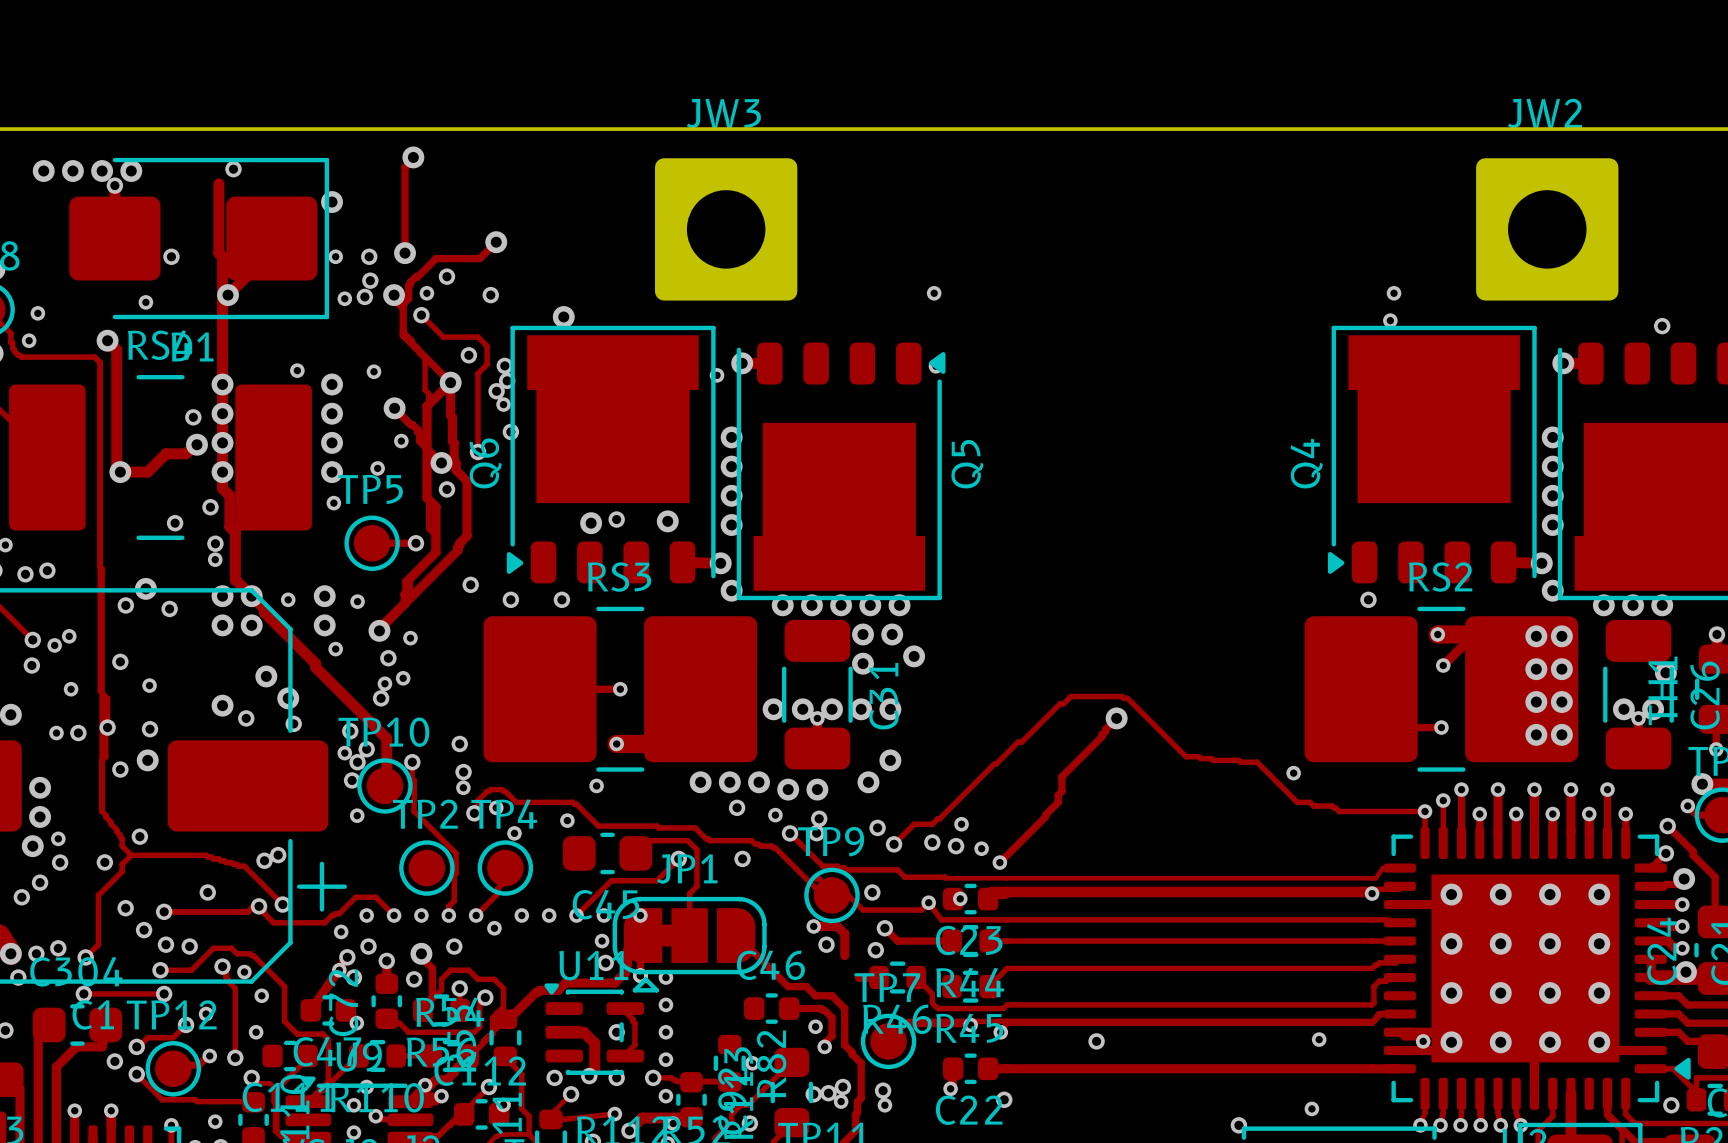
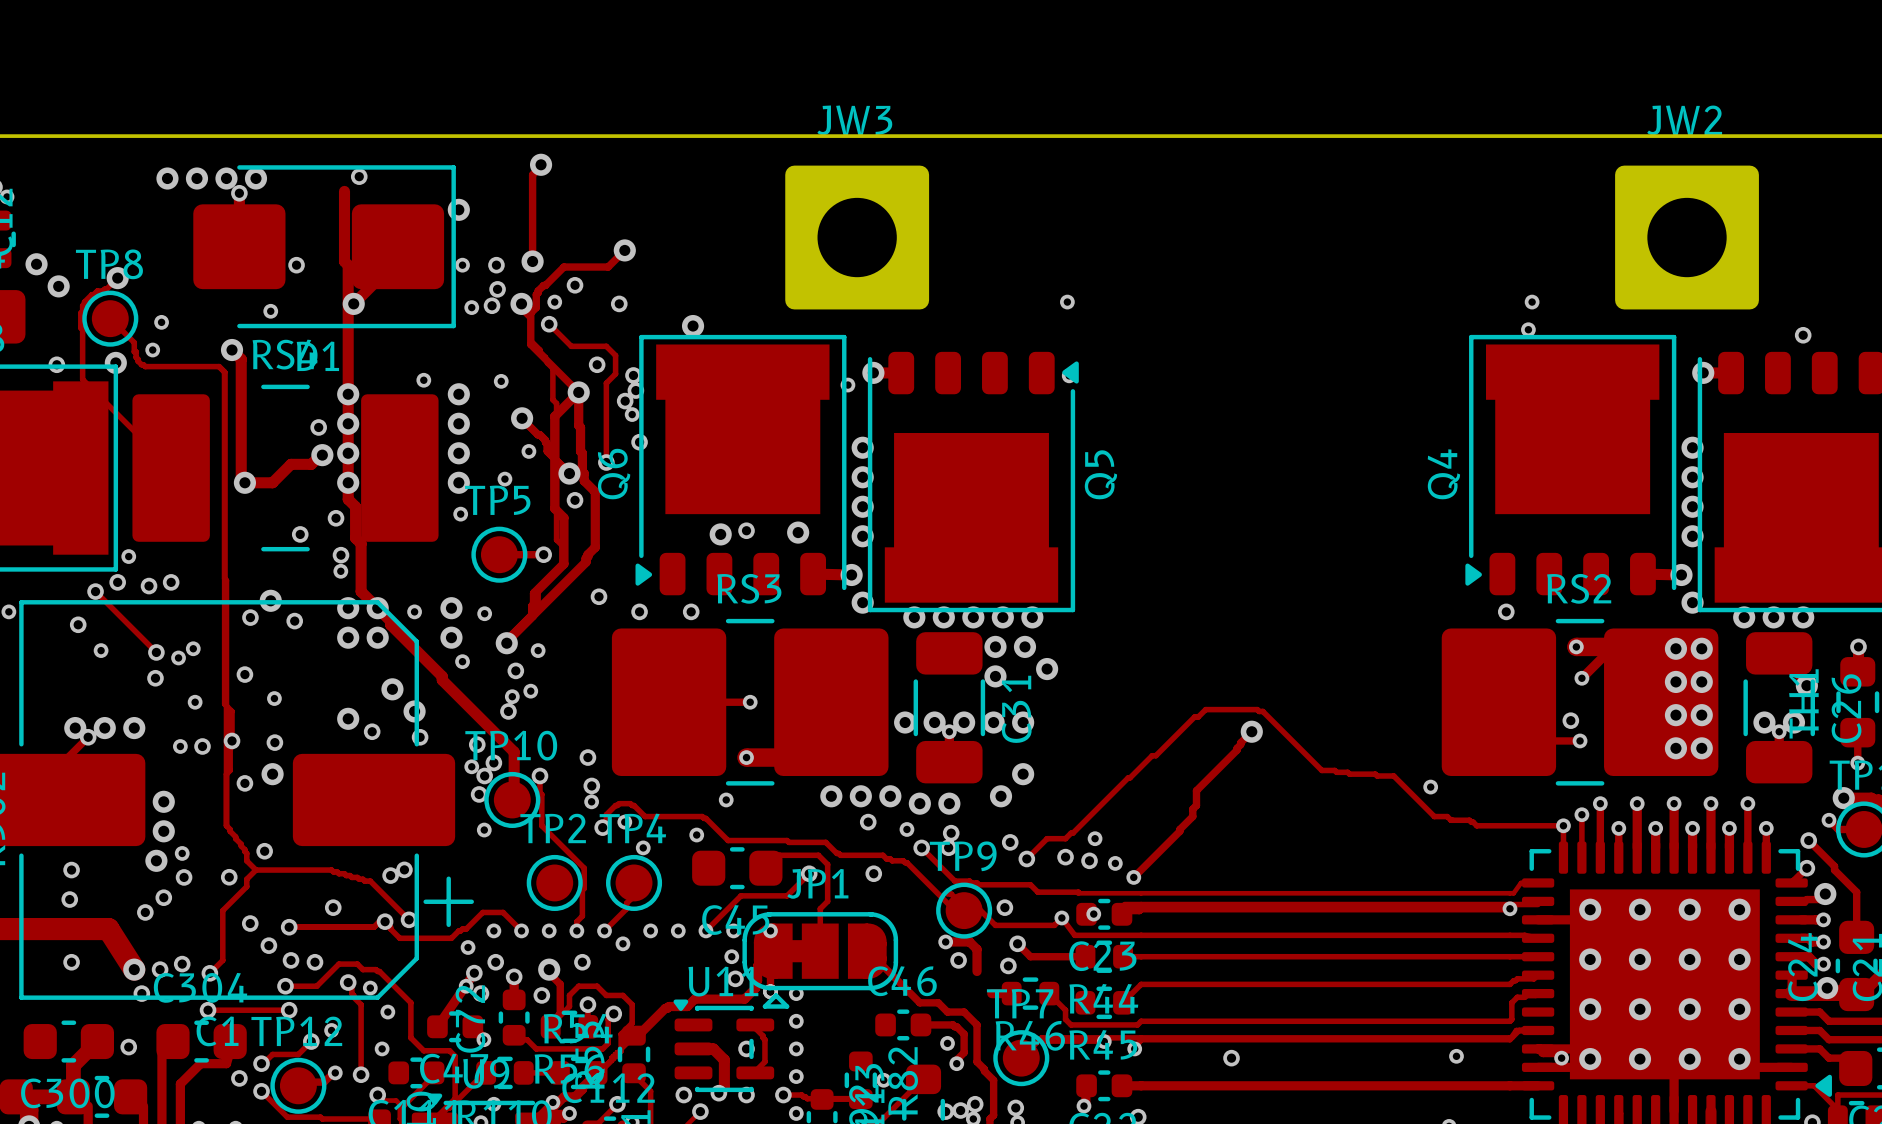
via: none -> (1570, 720)

